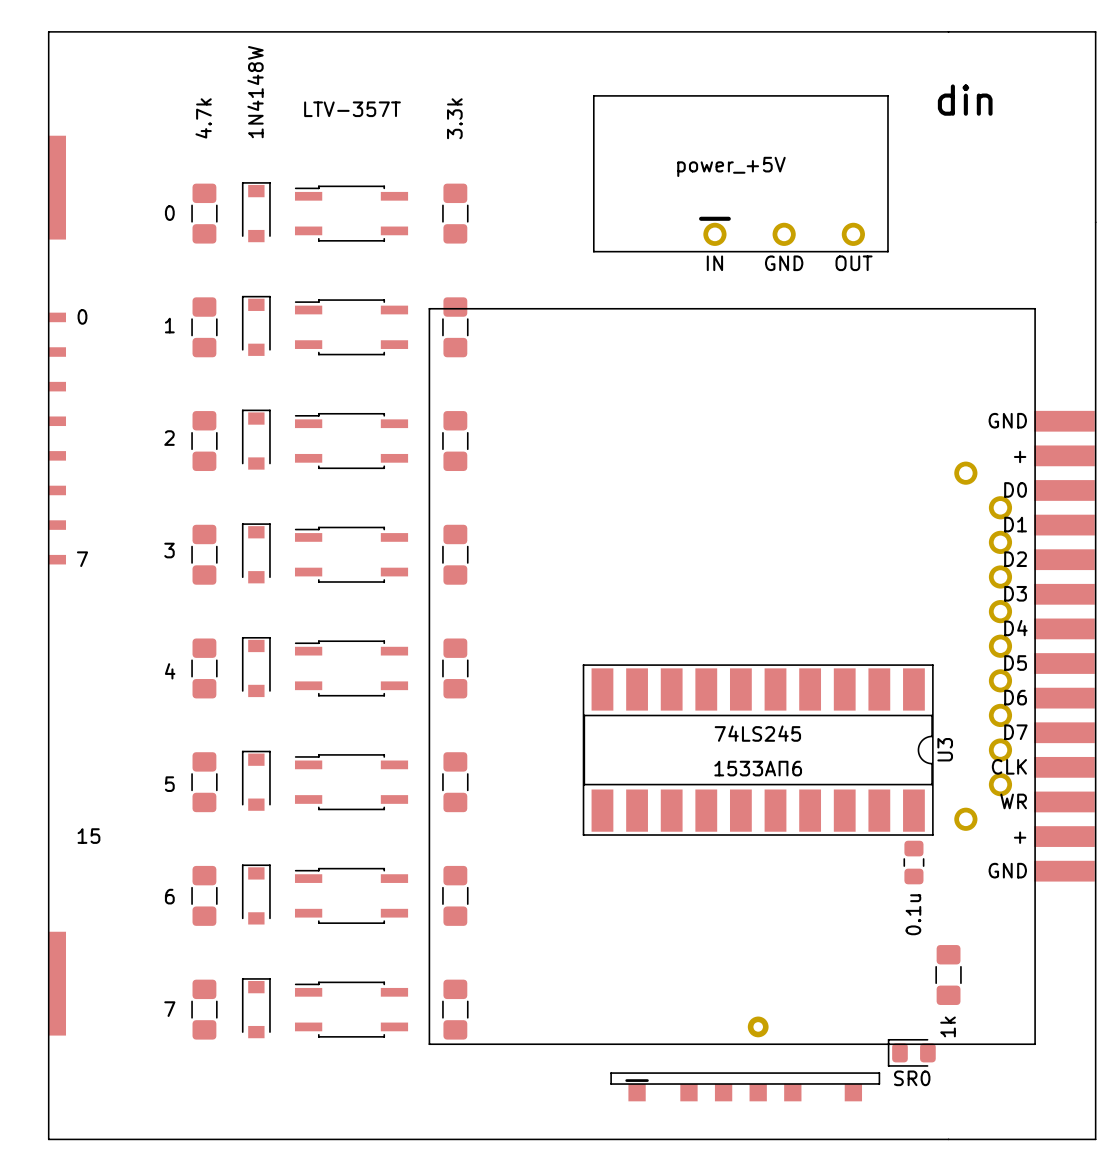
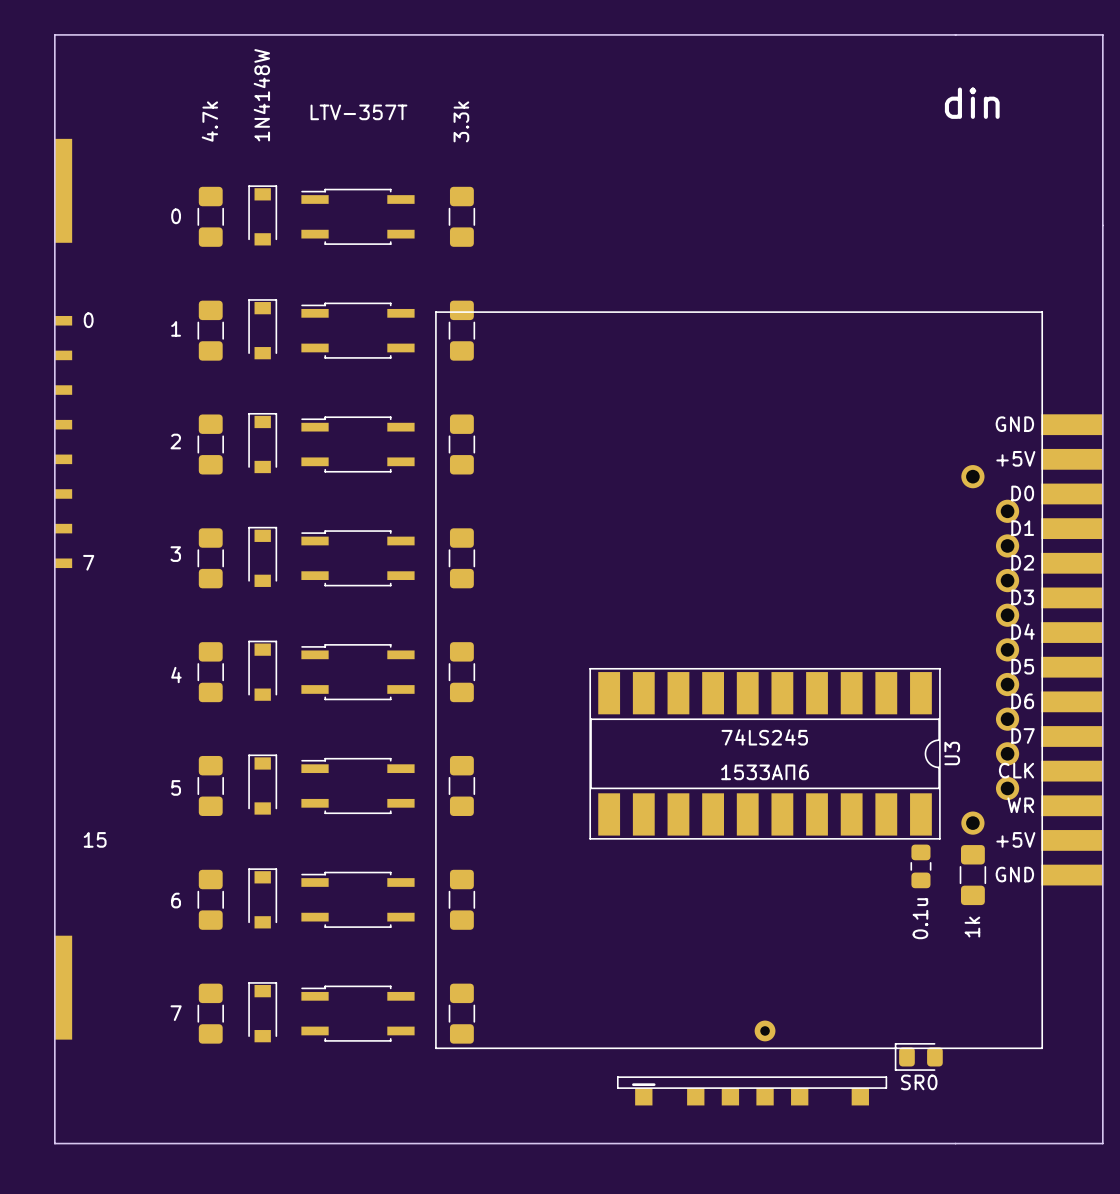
part: power_+5V (740, 173) -> none
part text: + (1020, 456) -> +5V (1015, 458)
part text: + (1020, 837) -> +5V (1015, 839)
part position: (948, 975) -> (972, 875)

